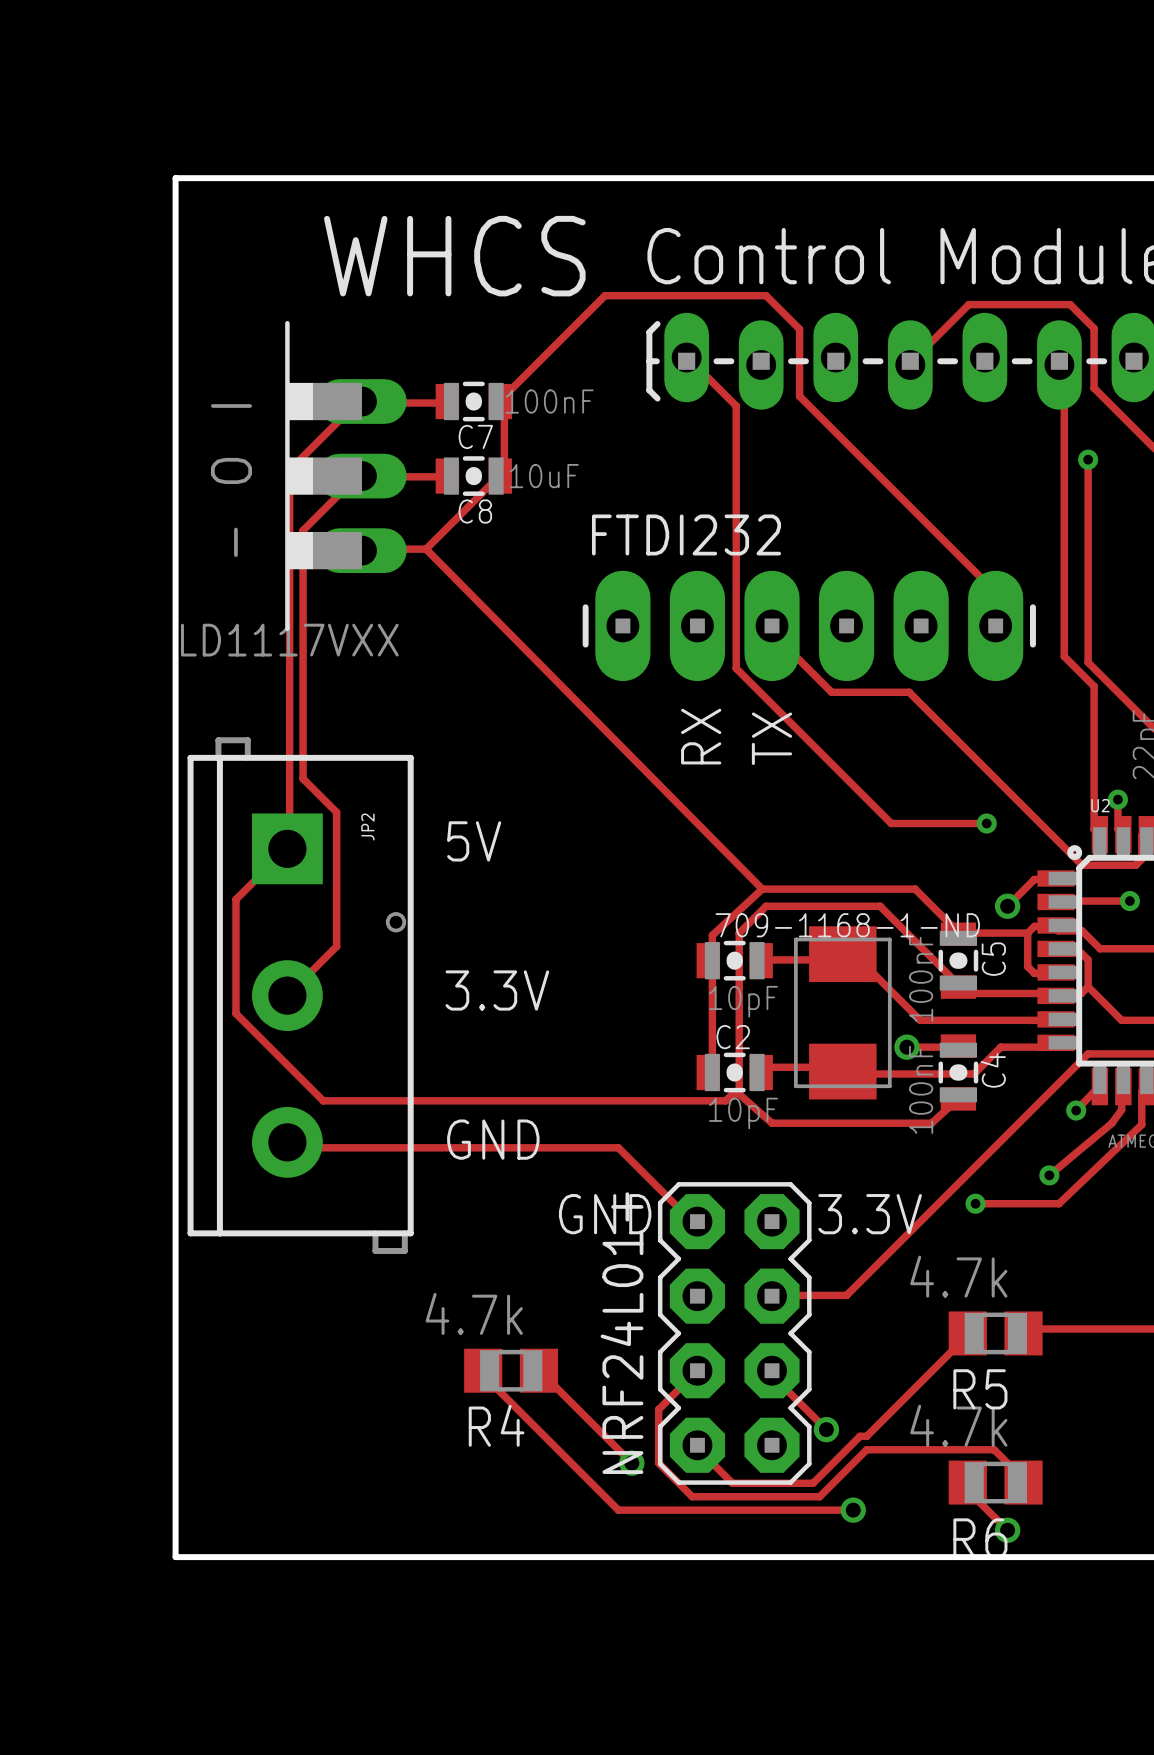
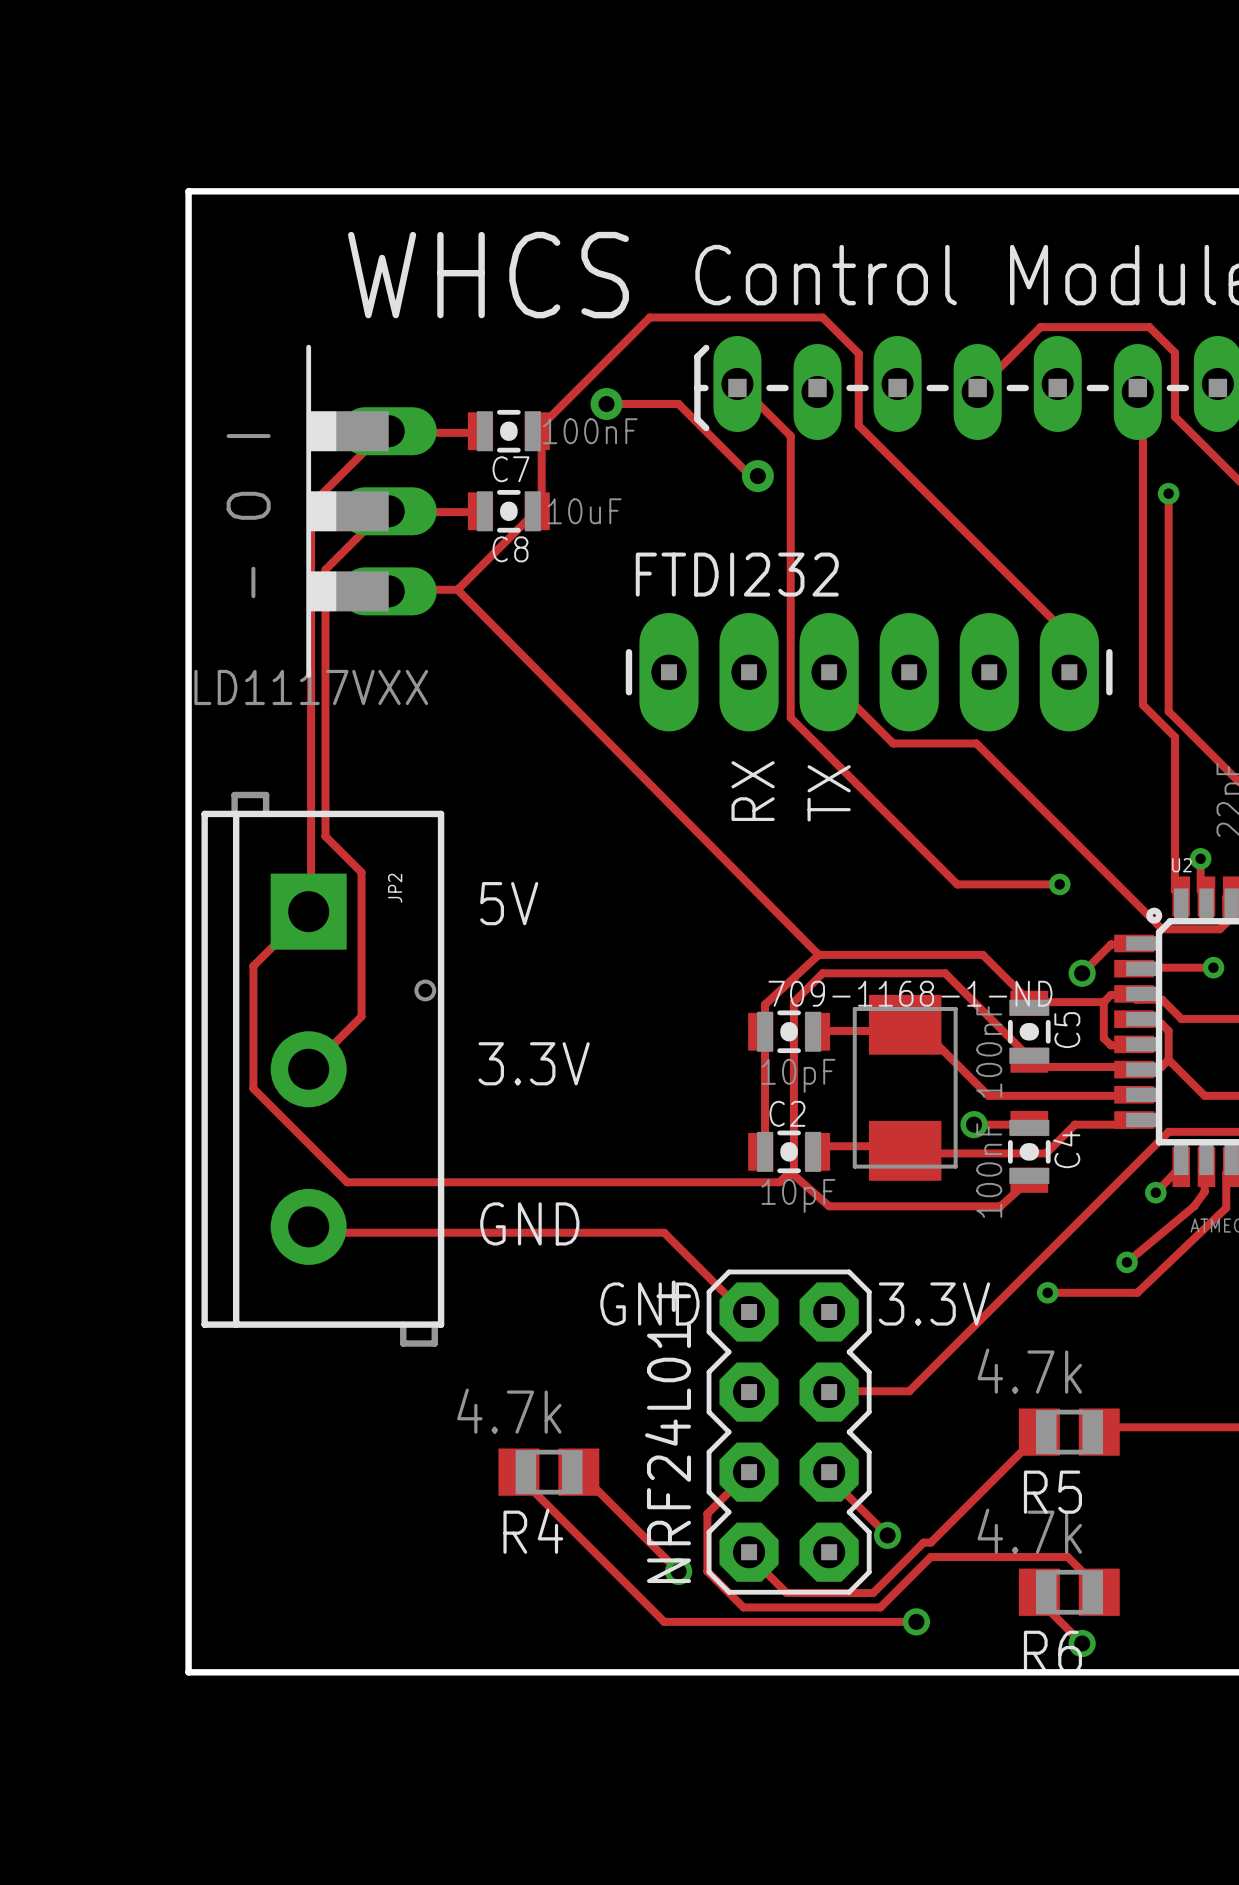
track: none -> (606, 404) (678, 404) (750, 476) (757, 476)
via: none -> (606, 404)
via: none -> (757, 476)

